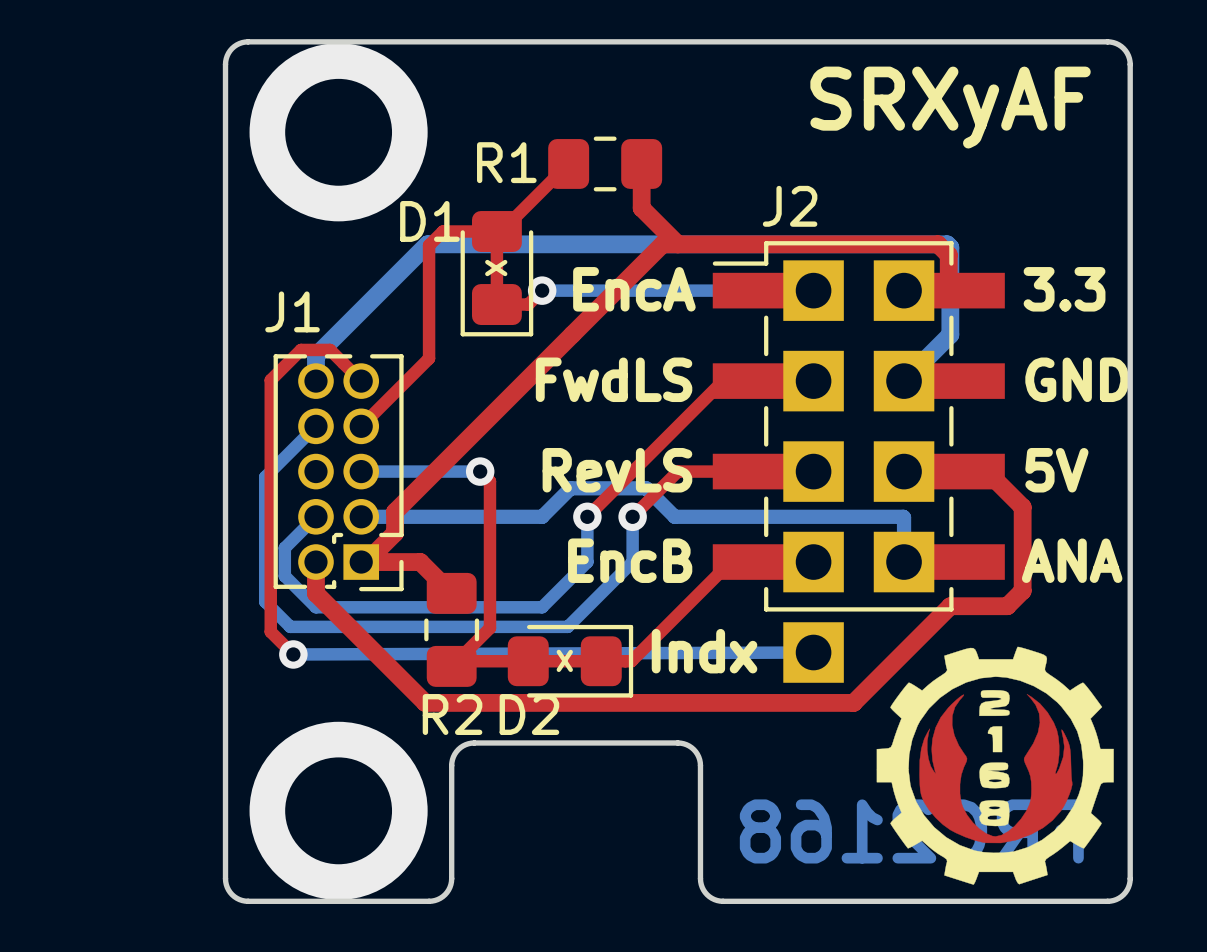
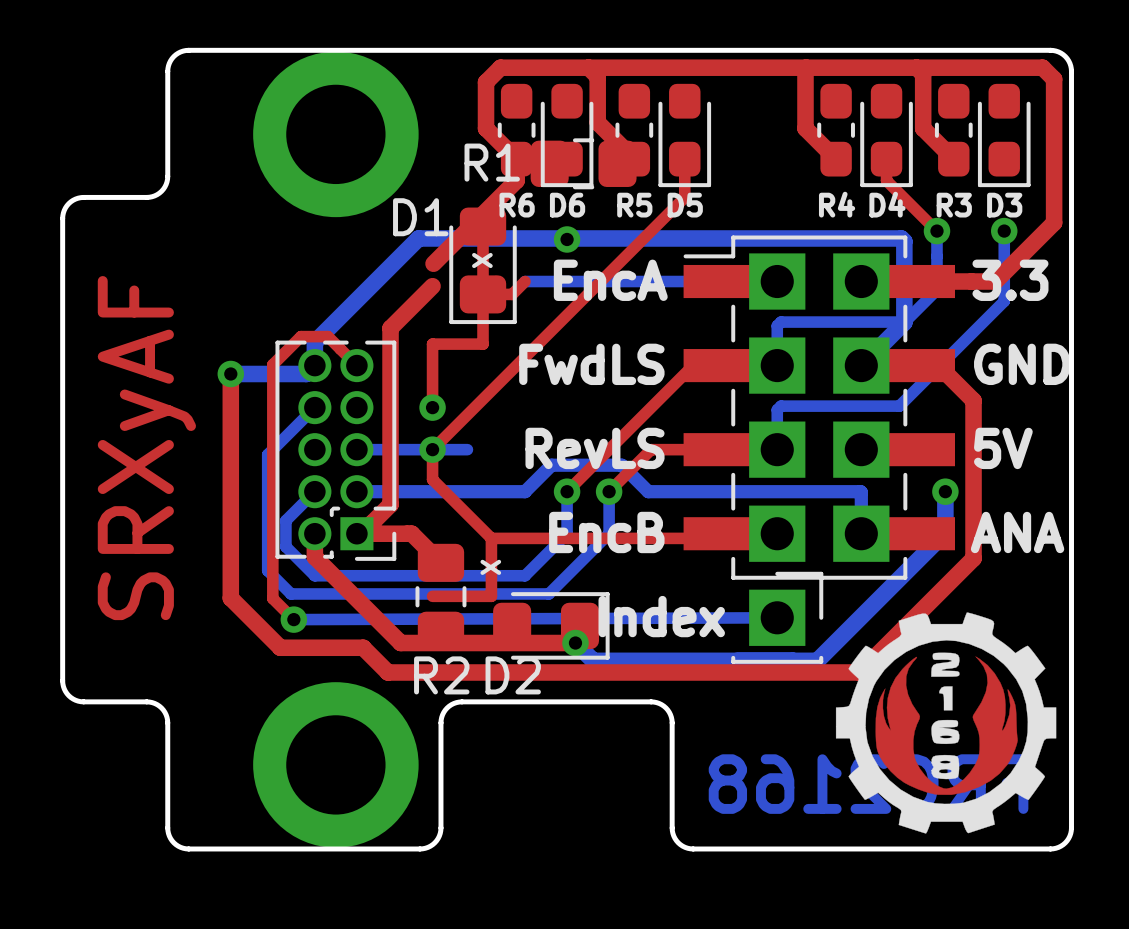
board edge: (248, 41) (239, 43) (232, 48) (227, 55) (225, 64) (225, 878) (227, 887) (232, 894) (239, 899) (248, 901) -> (251, 50) (186, 50) (178, 53) (170, 60) (167, 71) (167, 179) (164, 186) (159, 193) (146, 197) (78, 198) (68, 203) (63, 213) (62, 680) (67, 693) (78, 701) (149, 702) (157, 704) (163, 710) (167, 722) (167, 830) (173, 842) (186, 848) (251, 848)
top track: none -> (588, 67) (597, 76) (597, 122) (634, 159)
top track: none -> (806, 67) (805, 128) (836, 159)
top track: none -> (916, 67) (923, 74) (923, 128) (953, 159)
text: SRXyAF (950, 107) -> none
R6: none -> (516, 130)
R5: none -> (634, 130)
R4: none -> (836, 130)
R3: none -> (953, 130)
D6: none -> (567, 135)
D5: none -> (684, 135)
D4: none -> (886, 135)
D3: none -> (1004, 135)
top track: none -> (684, 159) (684, 197) (432, 449) (432, 479) (491, 538)
top track: none -> (886, 159) (886, 180) (936, 231)
top track: (568, 163) (501, 231) (442, 231) (429, 245) (429, 358) (361, 426) -> none
top track: (641, 163) (641, 208) (677, 244) -> none
J2 name: J2 (790, 206) -> none
bottom track: none -> (936, 231) (936, 289) (904, 322) (781, 322) (777, 325) (777, 365)
via: none -> (936, 231)
bottom track: none -> (1004, 231) (1004, 301) (899, 406) (781, 406) (777, 409) (777, 449)
via: none -> (1004, 231)
via position: (542, 290) -> (567, 239)
top track: (948, 290) (948, 255) (938, 244) (662, 244) (395, 511) (395, 533) -> (902, 281) (995, 281) (1054, 222) (1054, 79) (1042, 67) (500, 67) (486, 82) (486, 128) (516, 159) (516, 180) (433, 263)
top track: none -> (432, 286) (390, 328) (390, 504) (388, 506)
top track: none -> (483, 294) (483, 344) (432, 344) (432, 407)
J1 name: J1 (292, 311) -> none
bottom track: none -> (314, 365) (306, 373) (230, 373)
via: none -> (230, 373)
via: none -> (432, 407)
text: none -> SRXyAF (146, 448)
via: none -> (432, 449)
top track: (480, 471) (489, 481) (489, 628) (451, 666) -> none
via: (480, 471) -> none
top track: (987, 471) (1022, 507) (1022, 590) -> (902, 365) (938, 365) (973, 400) (973, 558) (971, 560)
bottom track: none -> (945, 491) (945, 532) (817, 660) (593, 660) (575, 643)
via: none -> (945, 491)
top track: (730, 562) (631, 661) (456, 661) -> none
top track: none -> (735, 533) (731, 538) (491, 538)
top track: none -> (491, 538) (491, 596) (432, 596)
top track: (315, 587) (315, 593) (425, 702) (853, 702) (950, 606) (1007, 606) -> (230, 373) (230, 598) (280, 647) (363, 647) (387, 672) (859, 672) (957, 574)
top track: none -> (314, 557) (400, 643) (575, 643)
part footprint: [783, 622, 844, 683] -> [731, 571, 824, 664]
text: Indx (704, 651) -> Index (661, 616)
text rotation: 0° (564, 660) -> 90° counterclockwise (490, 567)
text position: X (564, 660) -> X (490, 567)
via: none -> (575, 643)

